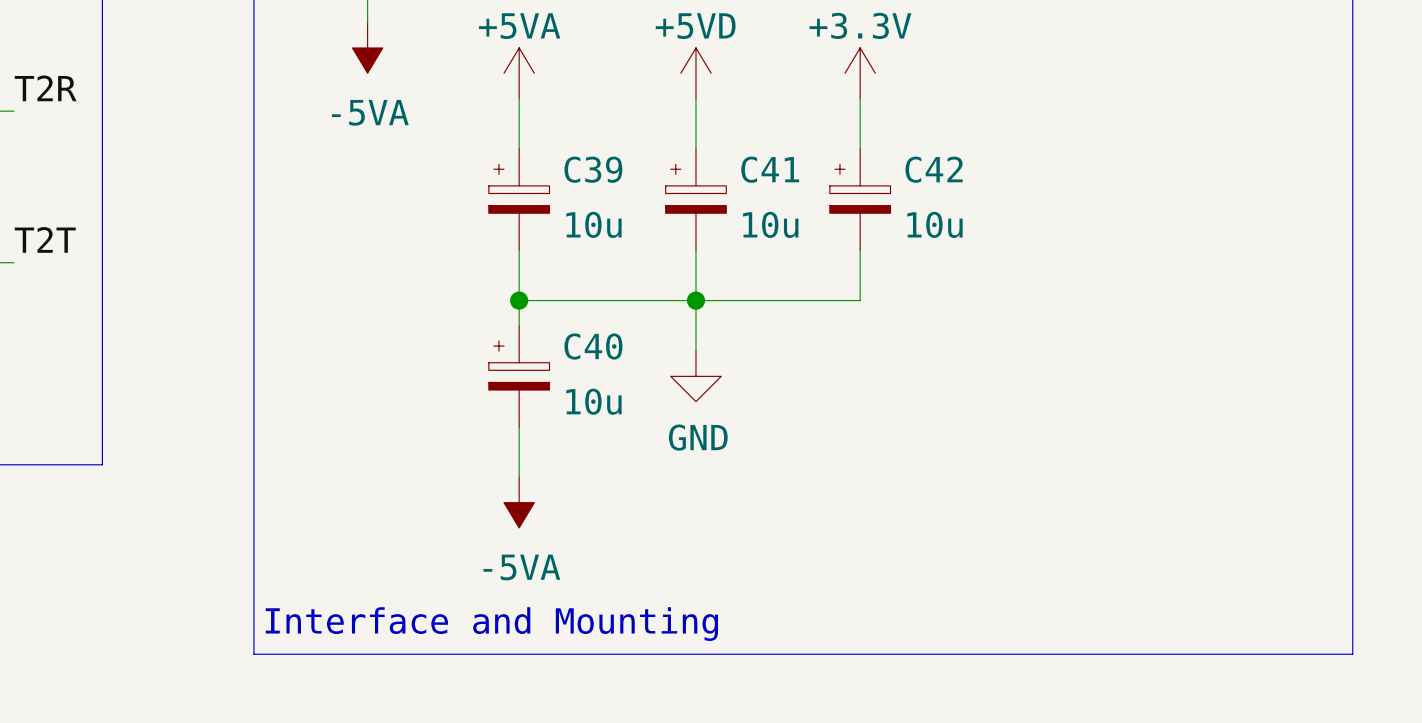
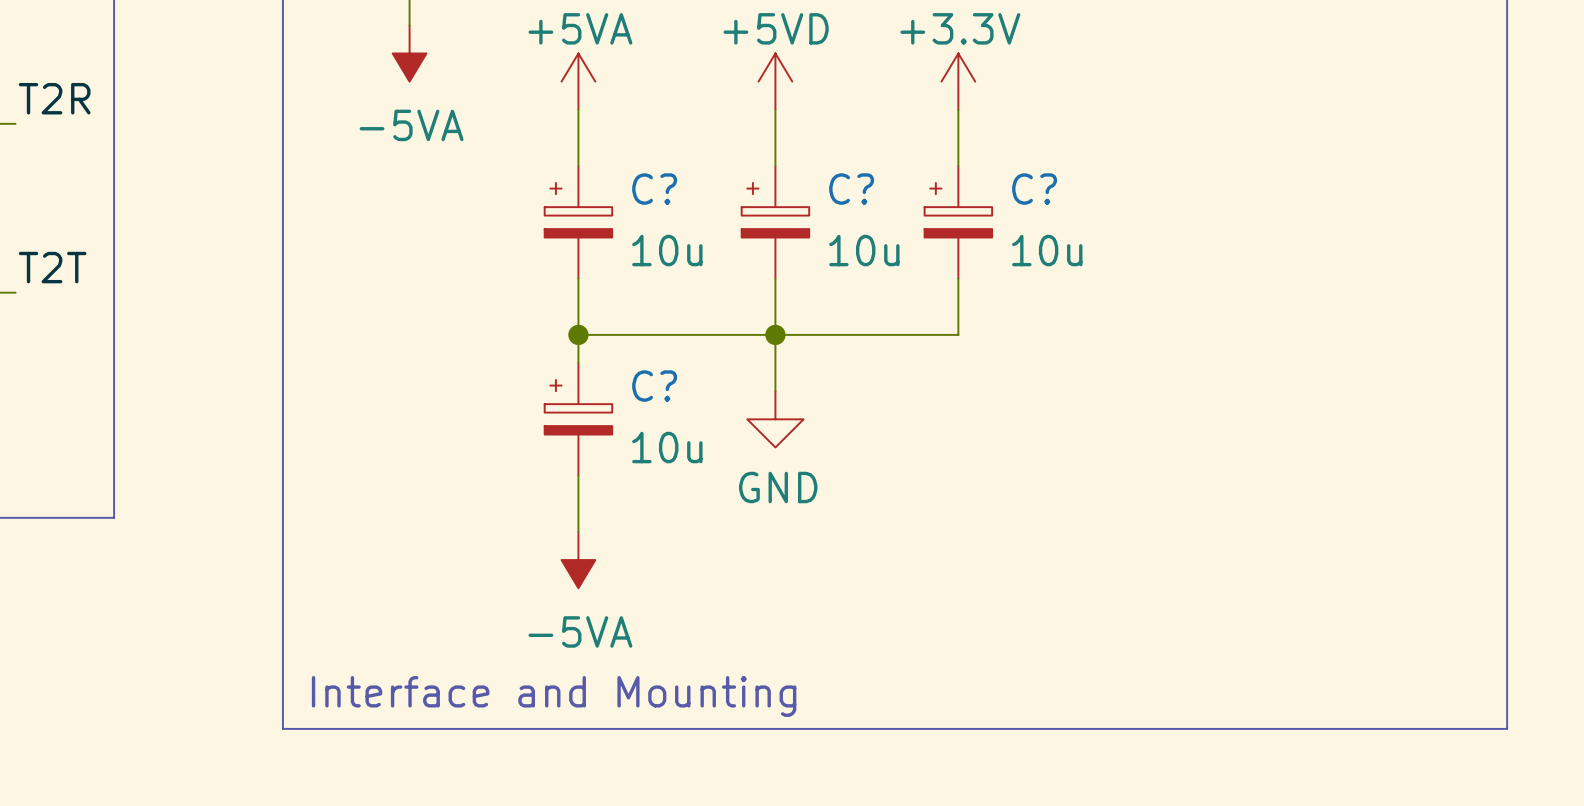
C39 name: C39 (593, 169) -> C? (654, 189)
C41 name: C41 (770, 169) -> C? (851, 189)
C42 name: C42 (934, 169) -> C? (1034, 189)
C40 name: C40 (593, 346) -> C? (654, 386)

